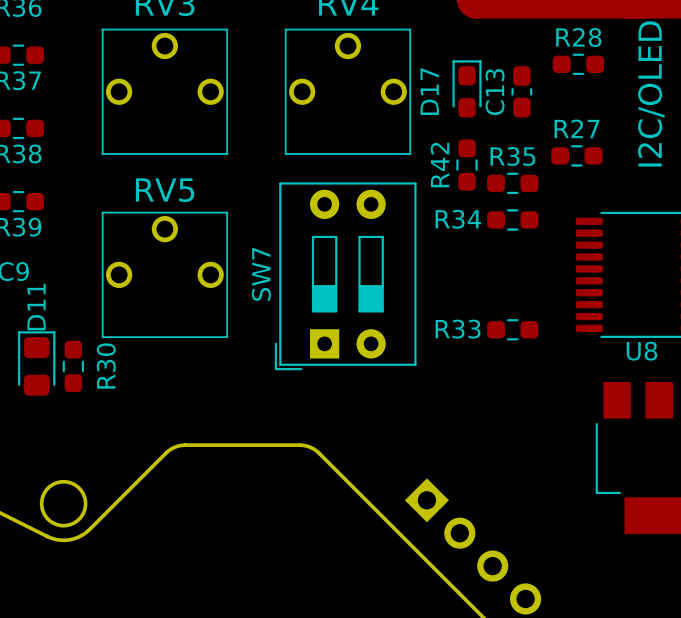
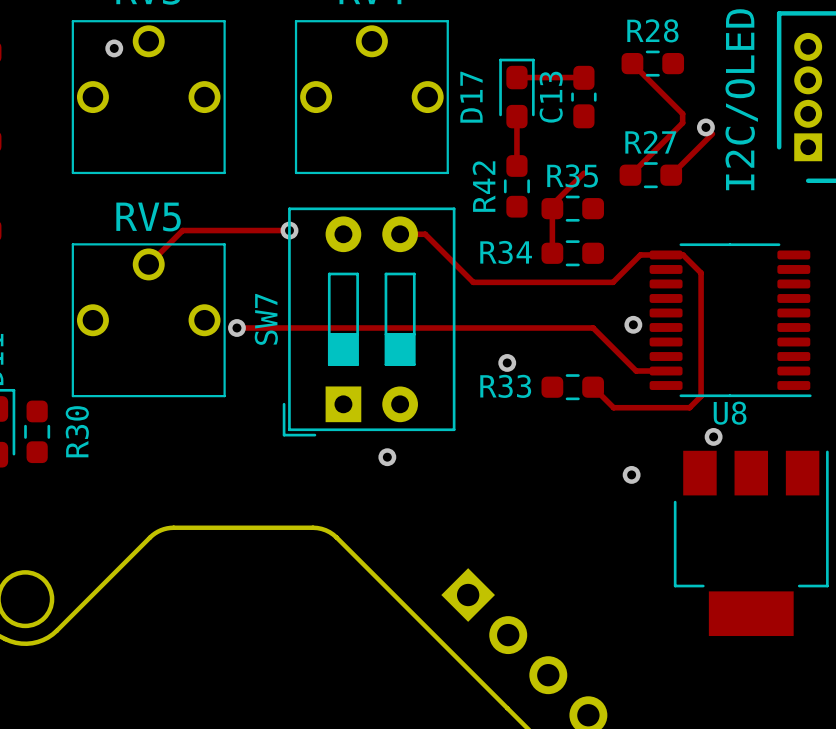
via: none -> (114, 48)
track: none -> (632, 63) (682, 113) (682, 123) (630, 175)
track: none -> (516, 77) (583, 77)
track: none -> (516, 116) (516, 165)
via: none -> (705, 127)
track: none -> (712, 133) (671, 175)
track: none -> (583, 173) (550, 206) (552, 208) (552, 253)
track: none -> (289, 230) (182, 230) (148, 264)
via: none -> (289, 230)
track: none -> (400, 234) (425, 234) (473, 282) (613, 282) (640, 254) (683, 254) (701, 273) (701, 396) (689, 407) (613, 407) (593, 387)
via: none -> (633, 324)
track: none -> (236, 327) (593, 327) (636, 371) (666, 371)
via: none -> (236, 327)
via: none -> (507, 362)
via: none -> (713, 436)
via: none -> (387, 457)
via: none -> (631, 474)

